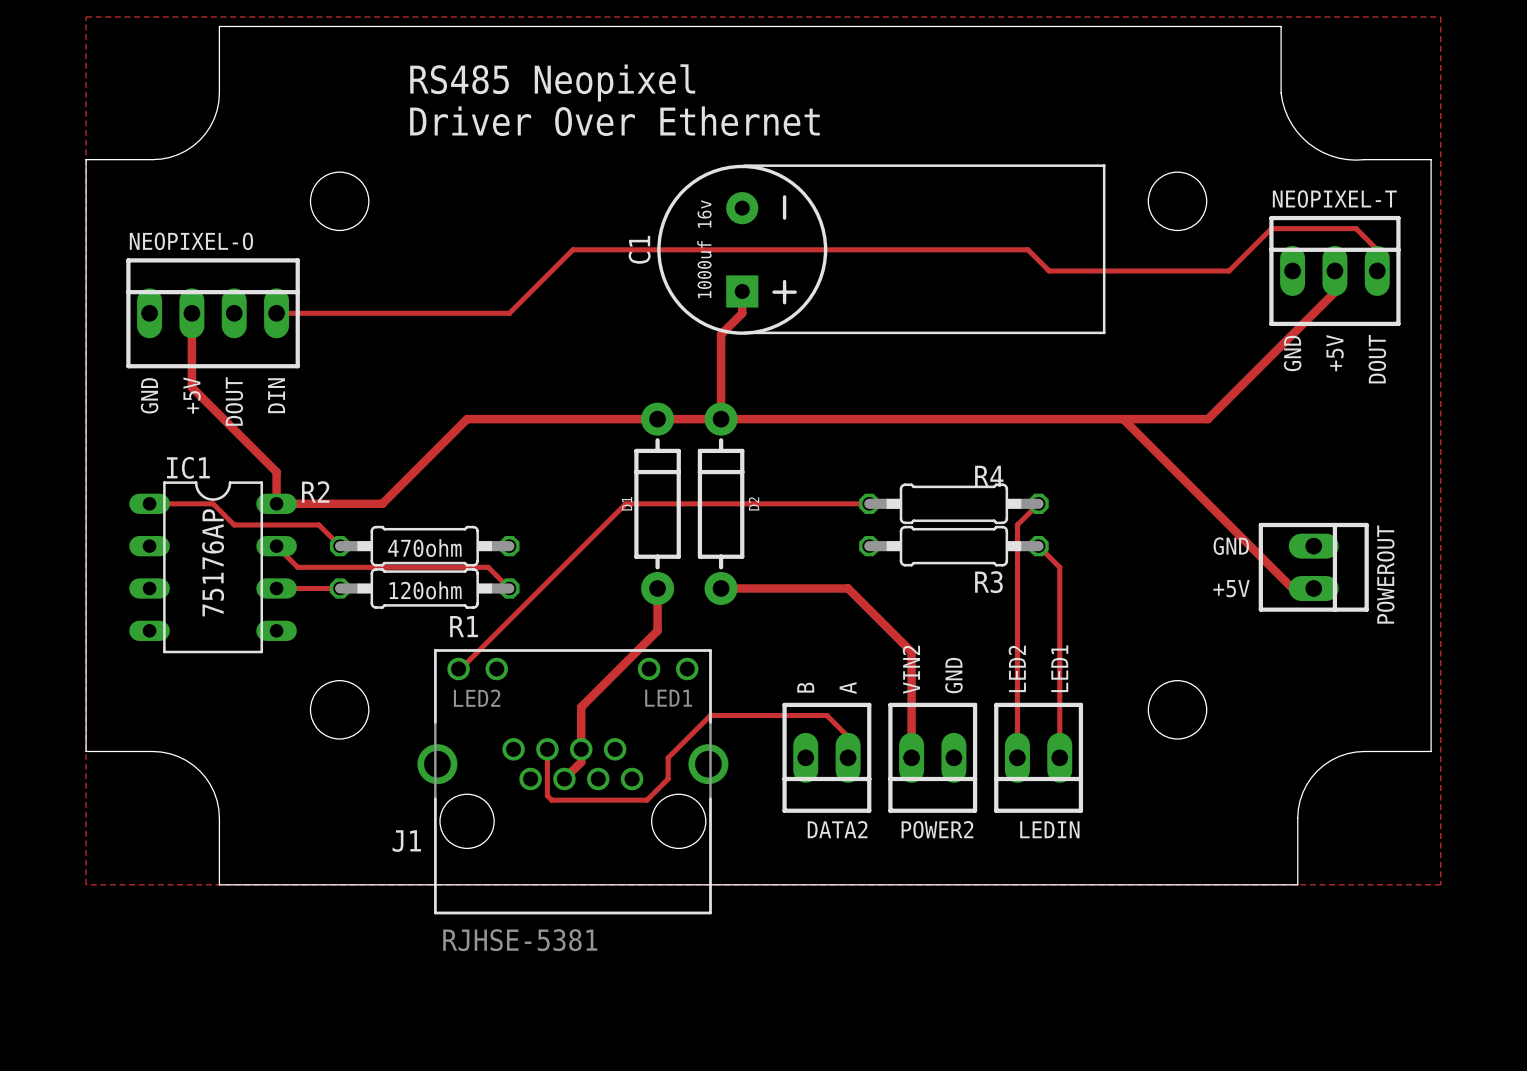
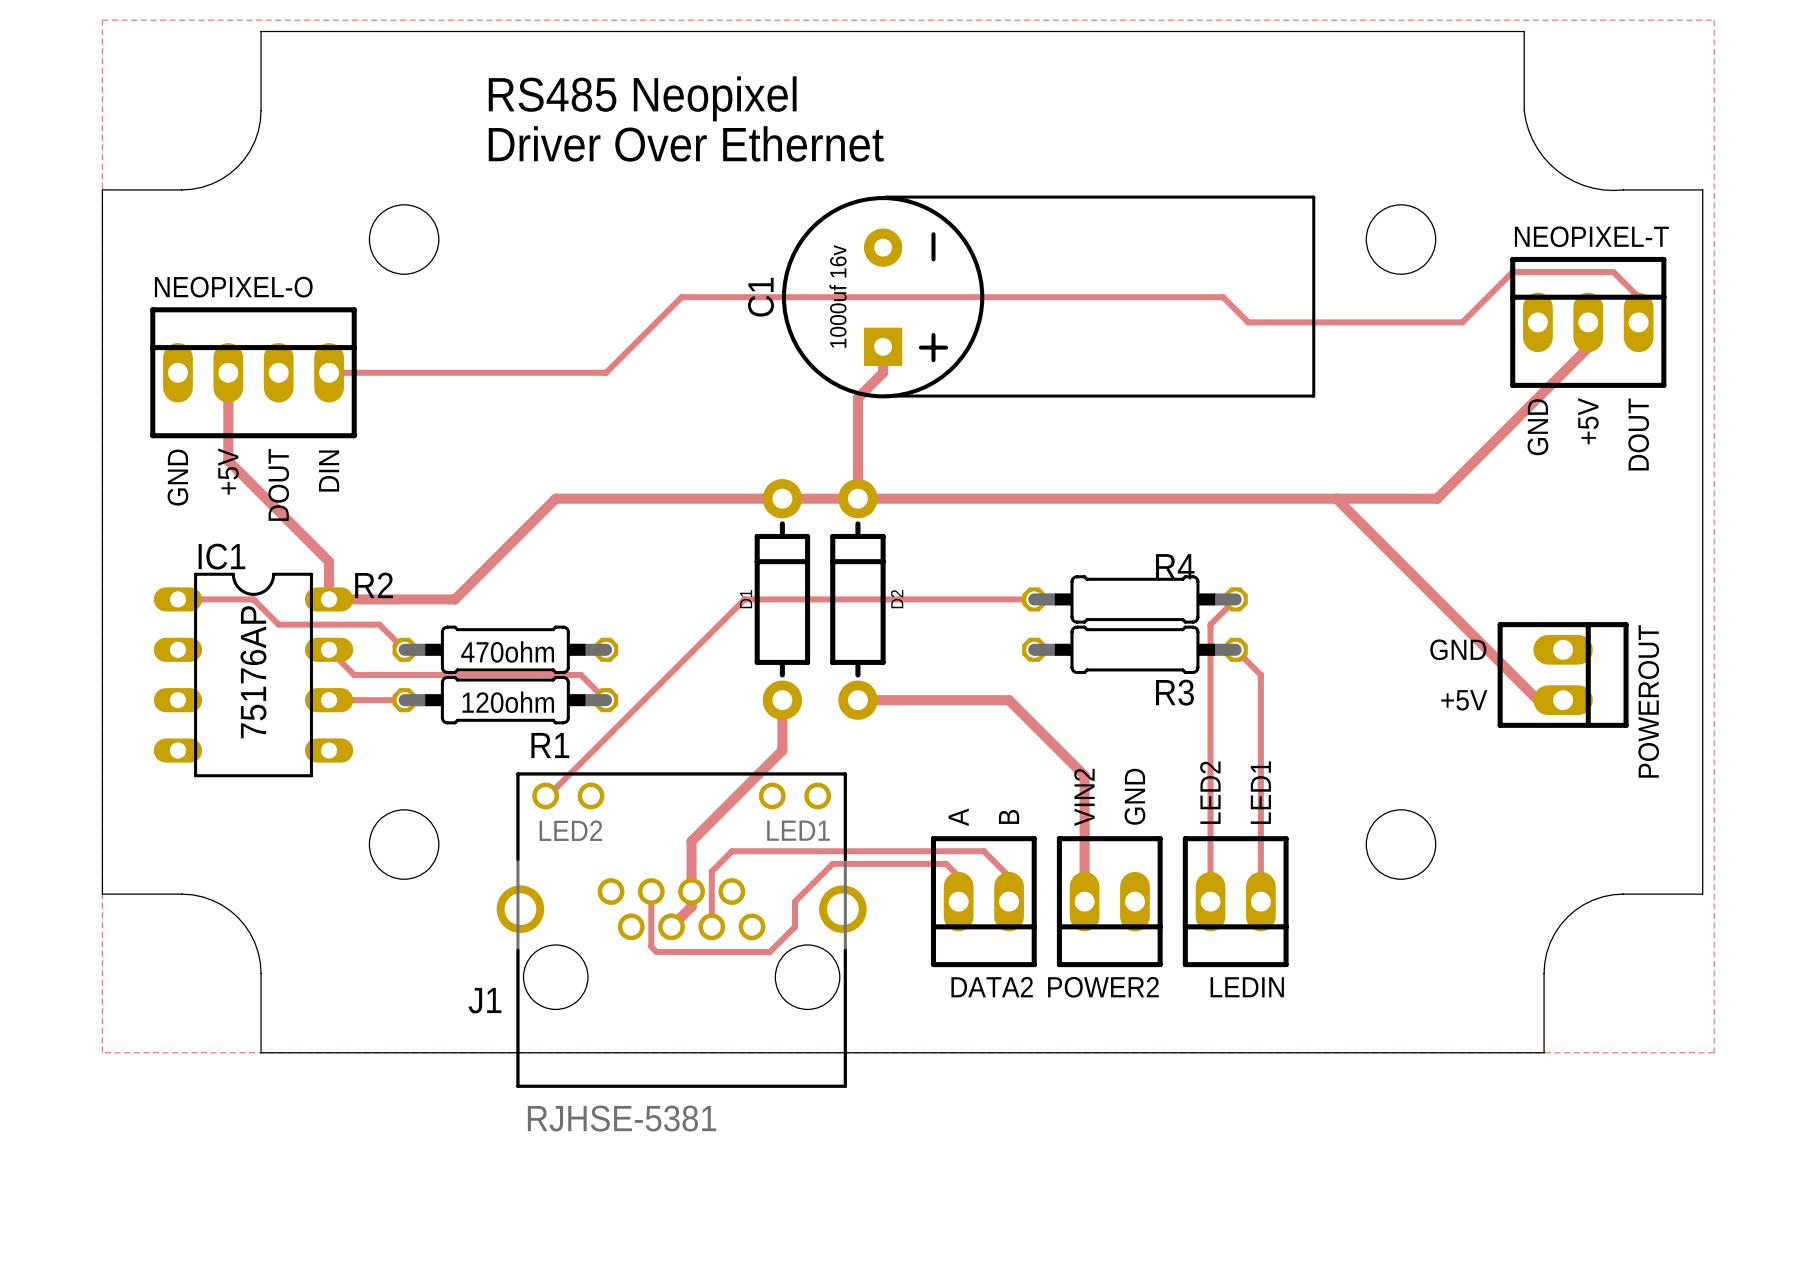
text: B (805, 687) -> A (958, 817)
text: A (848, 688) -> B (1009, 816)
track: (710, 715) (699, 726) -> (958, 901) (958, 876) (946, 863) (832, 863)
track: none -> (845, 851) (732, 851) (711, 871) (711, 926)

